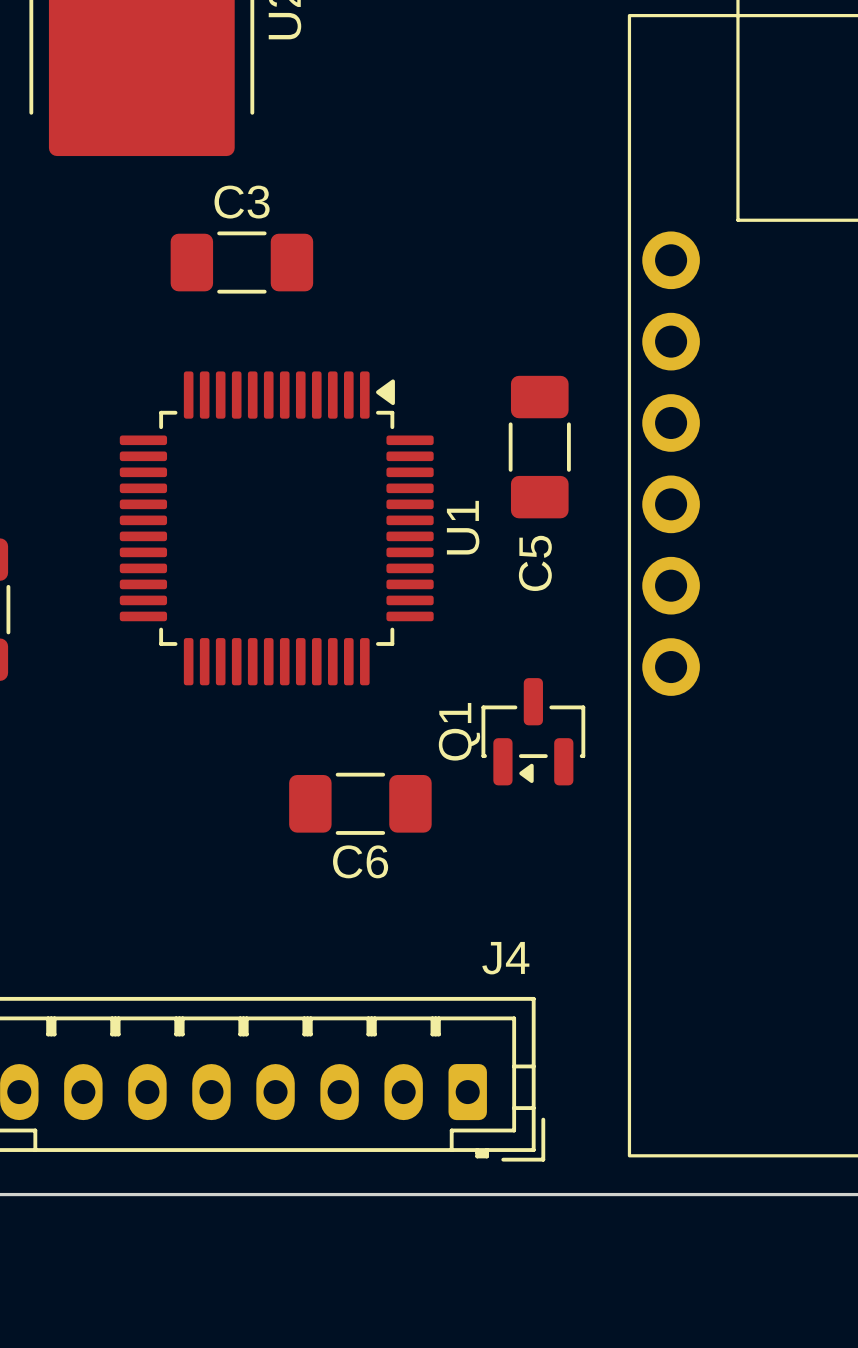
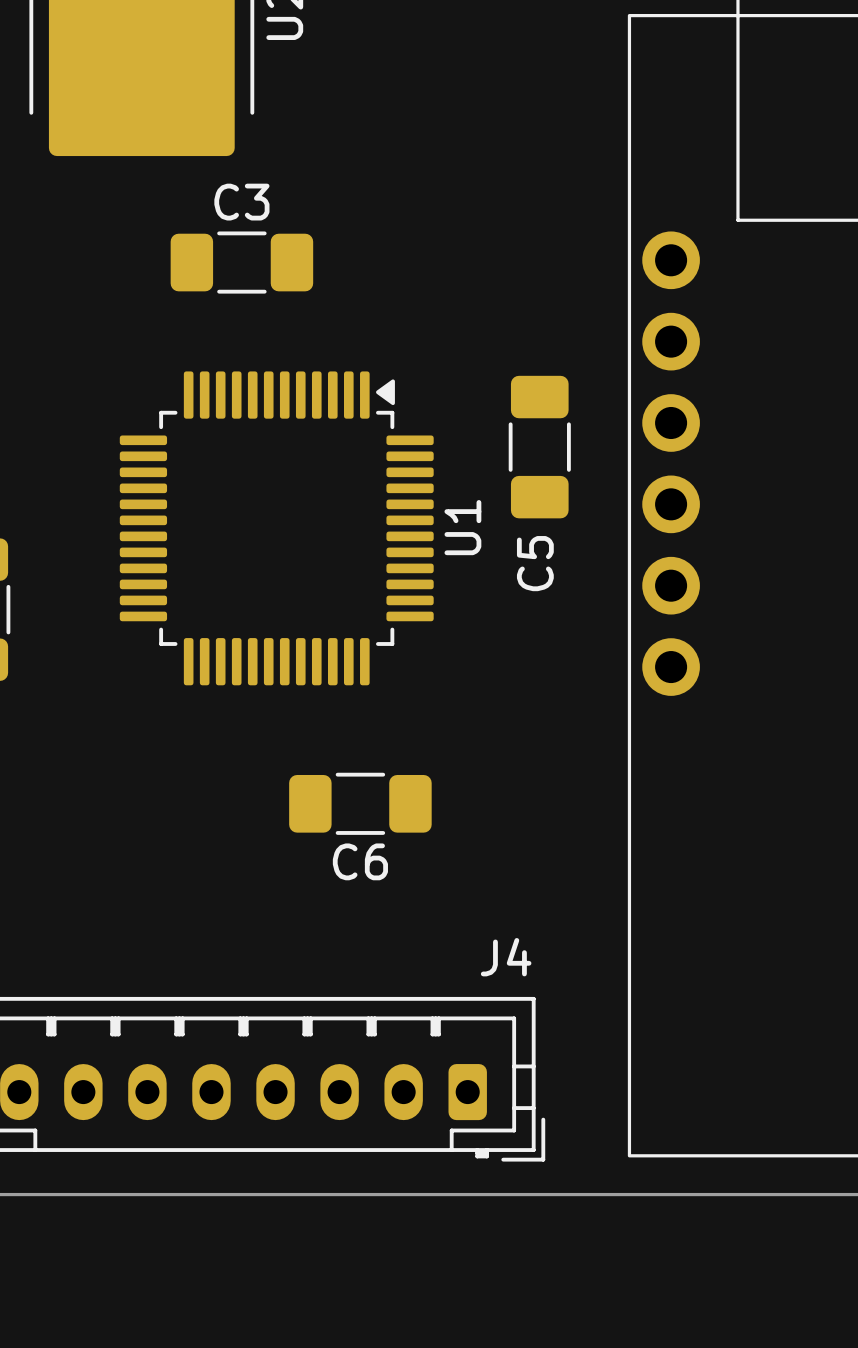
Q1: (533, 731) -> none

